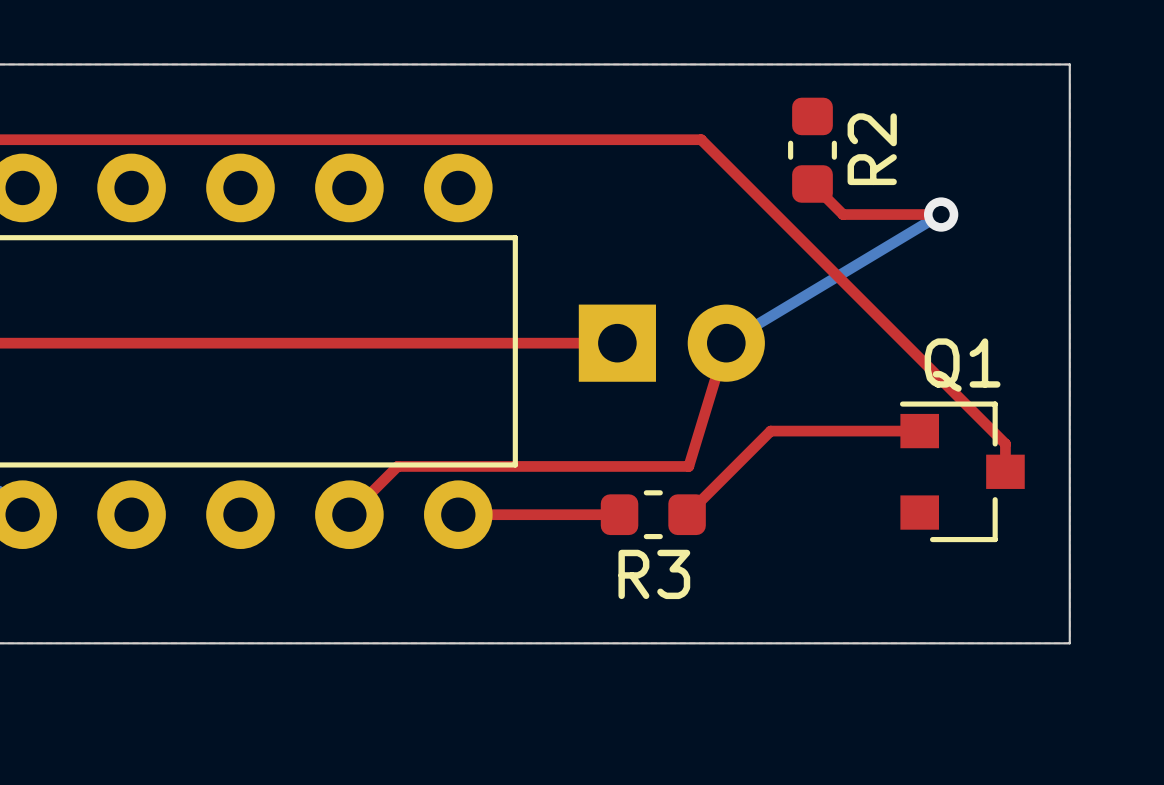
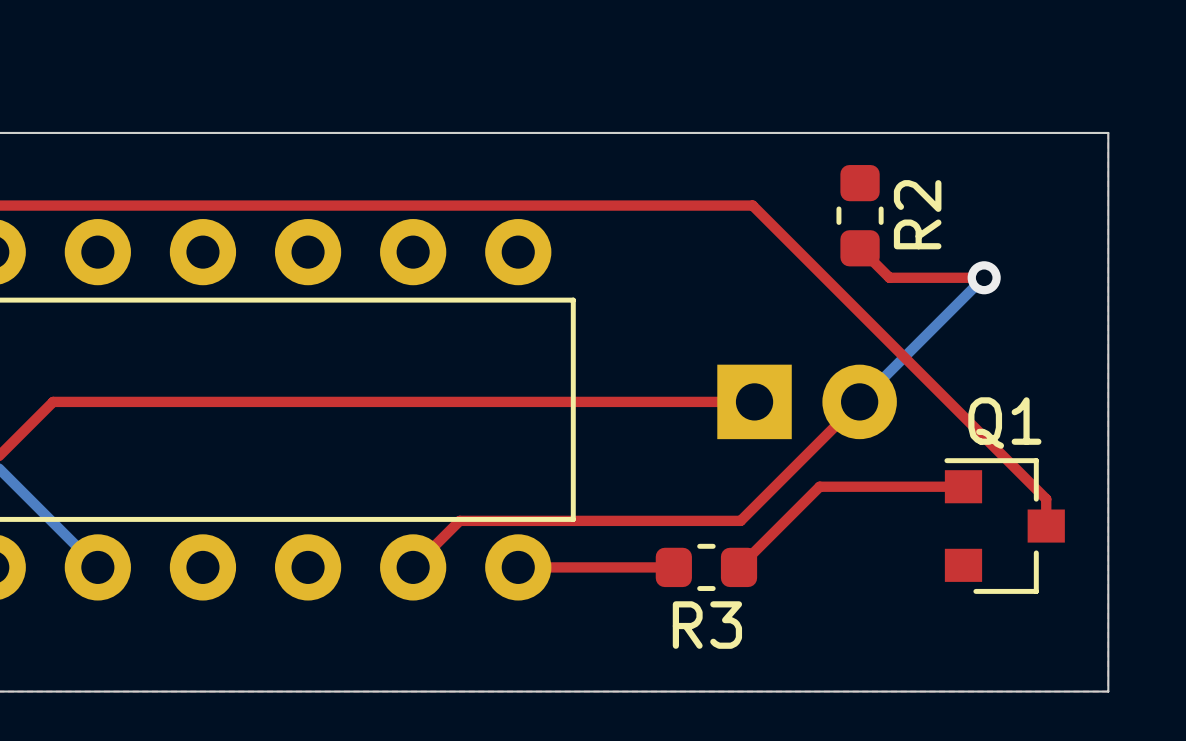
bottom track: (940, 214) (726, 343) -> (983, 277) (859, 401)
top track: none -> (671, 401) (754, 401)
part position: (671, 343) -> (807, 401)
top track: (726, 343) (688, 466) -> (859, 401) (740, 520)

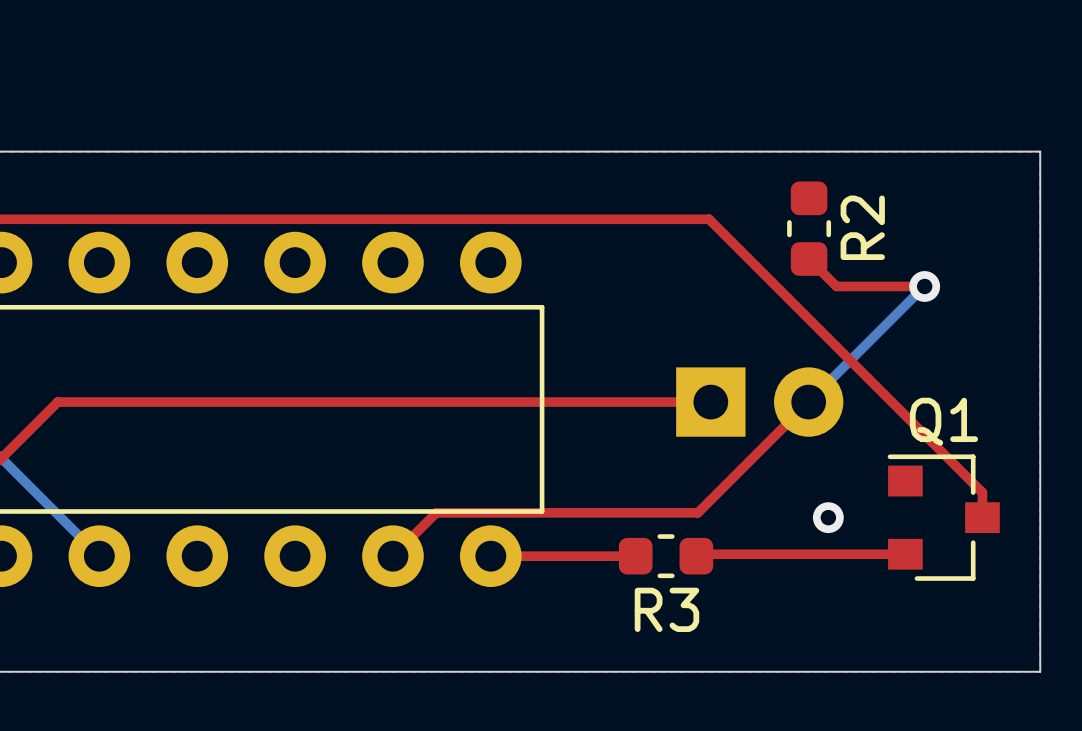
top track: (963, 486) (819, 486) (741, 565) -> (905, 554) (698, 554)
via: none -> (828, 517)

